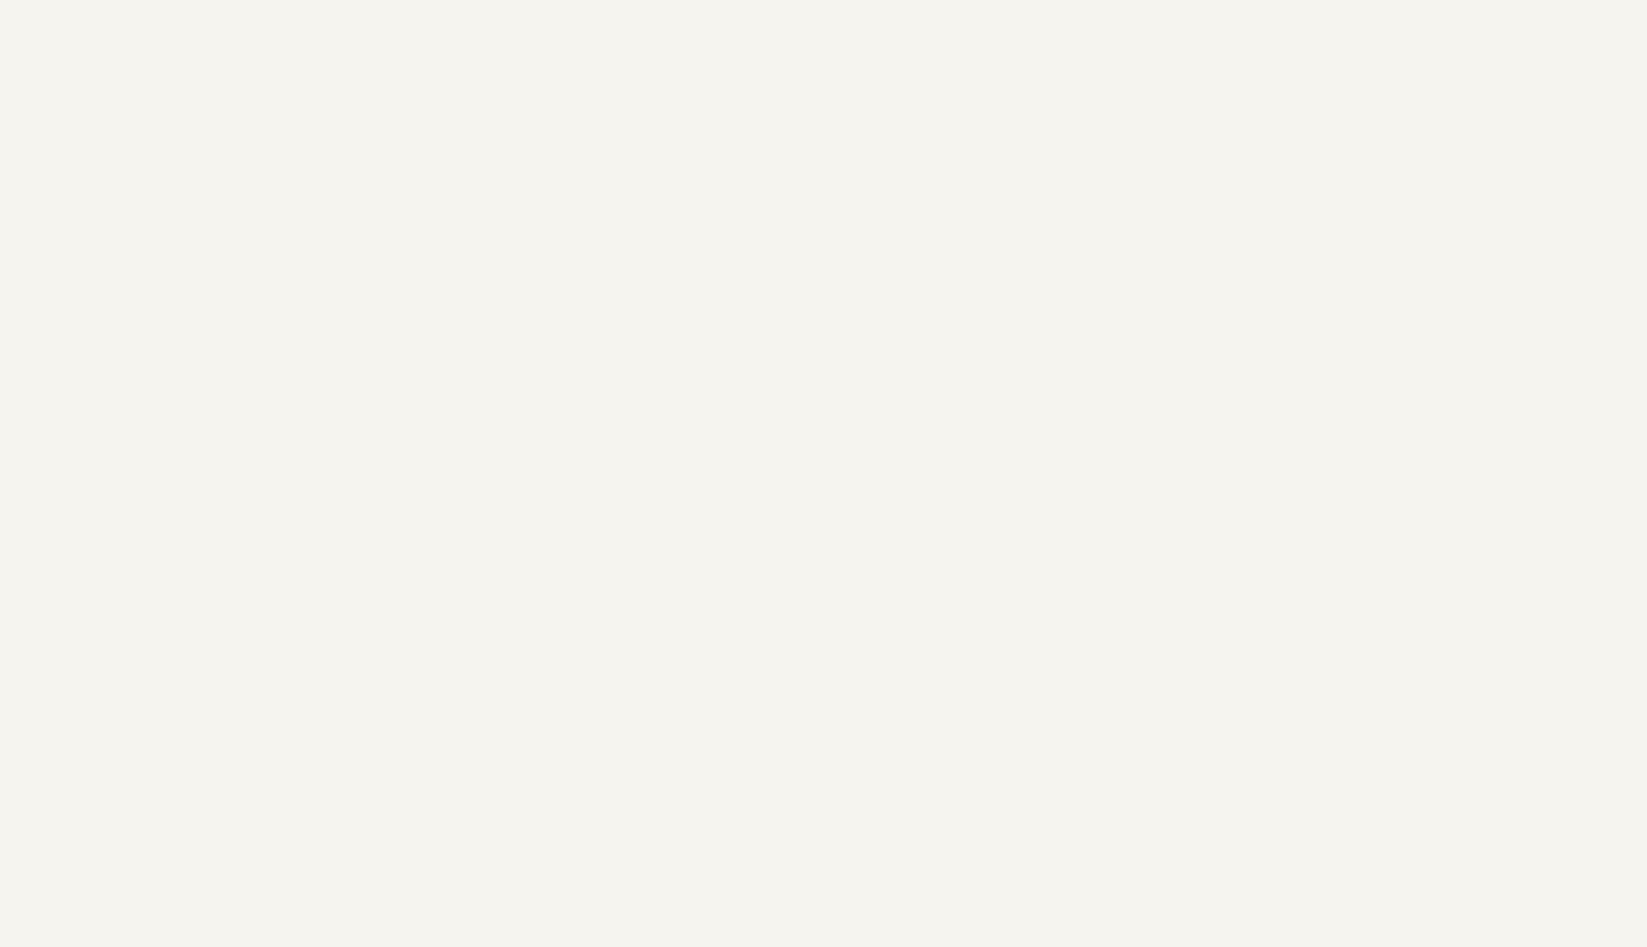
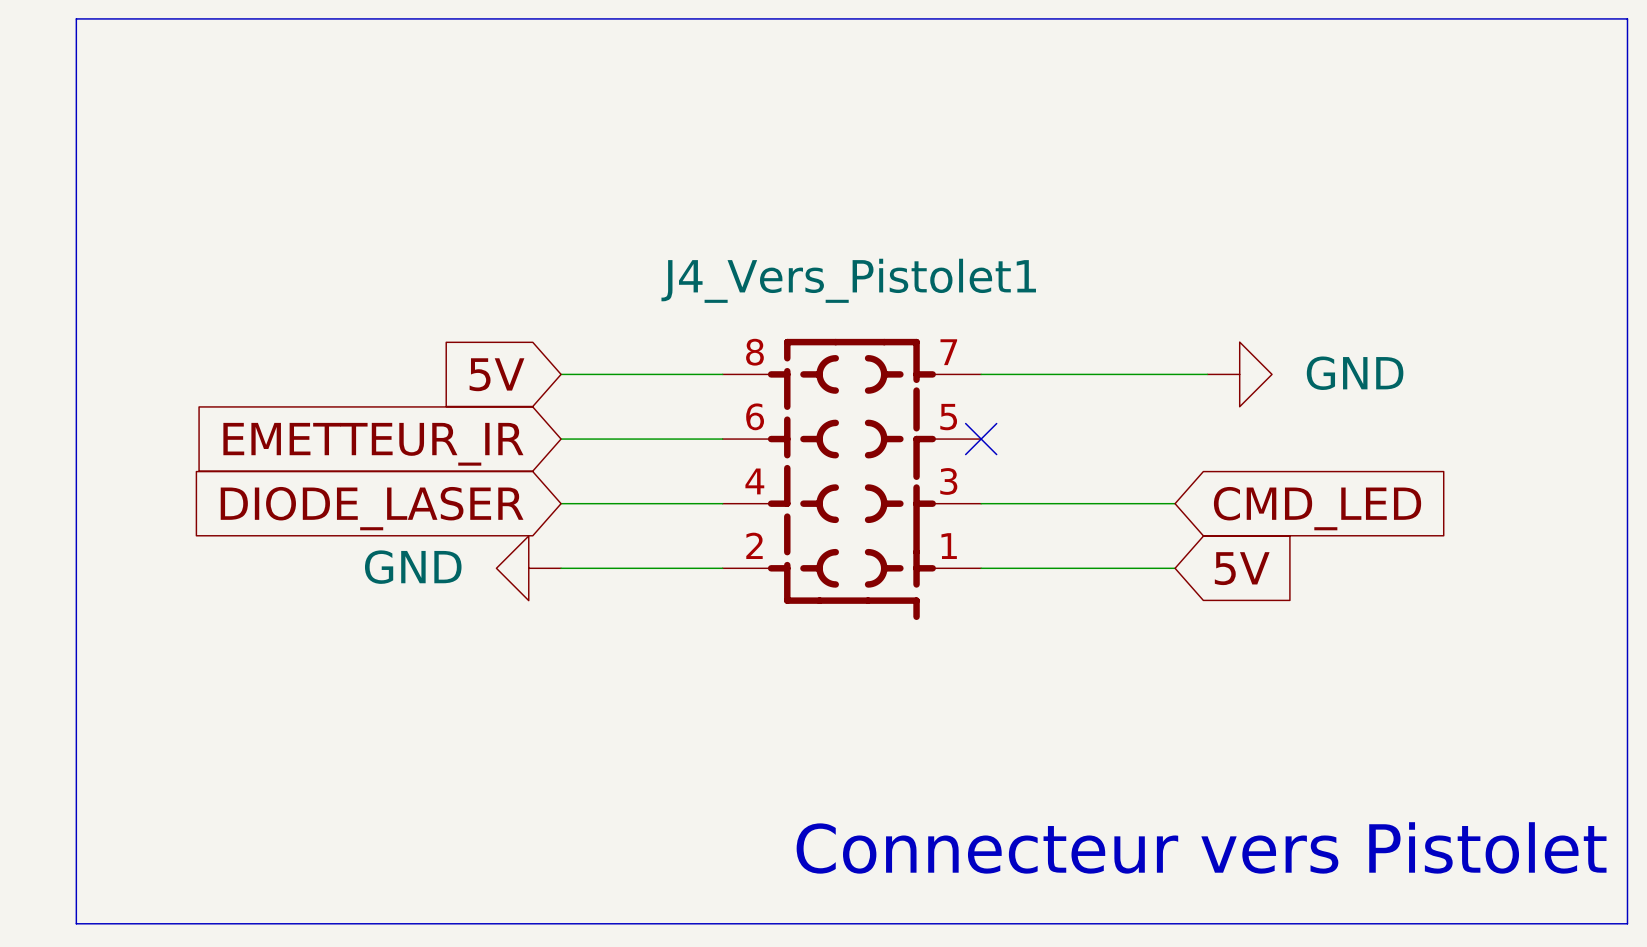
line: none -> (76, 18) (1627, 18) (1627, 923) (76, 923) (76, 18)
global label: none -> 5V (496, 374)
wire: none -> (561, 374) (722, 374)
wire: none -> (981, 374) (1207, 374)
power symbol: none -> GND (1239, 374)
wire: none -> (561, 439) (722, 439)
no-connect mark: none -> (981, 439)
global label: none -> EMETTEUR_IR (373, 444)
J4_Vers_Pistolet1: none -> (851, 479)
wire: none -> (561, 503) (722, 503)
wire: none -> (981, 503) (1175, 503)
global label: none -> DIODE_LASER (372, 508)
global label: none -> CMD_LED (1317, 508)
power symbol: none -> GND (528, 568)
wire: none -> (561, 568) (722, 568)
wire: none -> (981, 568) (1175, 568)
global label: none -> 5V (1242, 568)
text: none -> Connecteur vers Pistolet (1201, 847)

